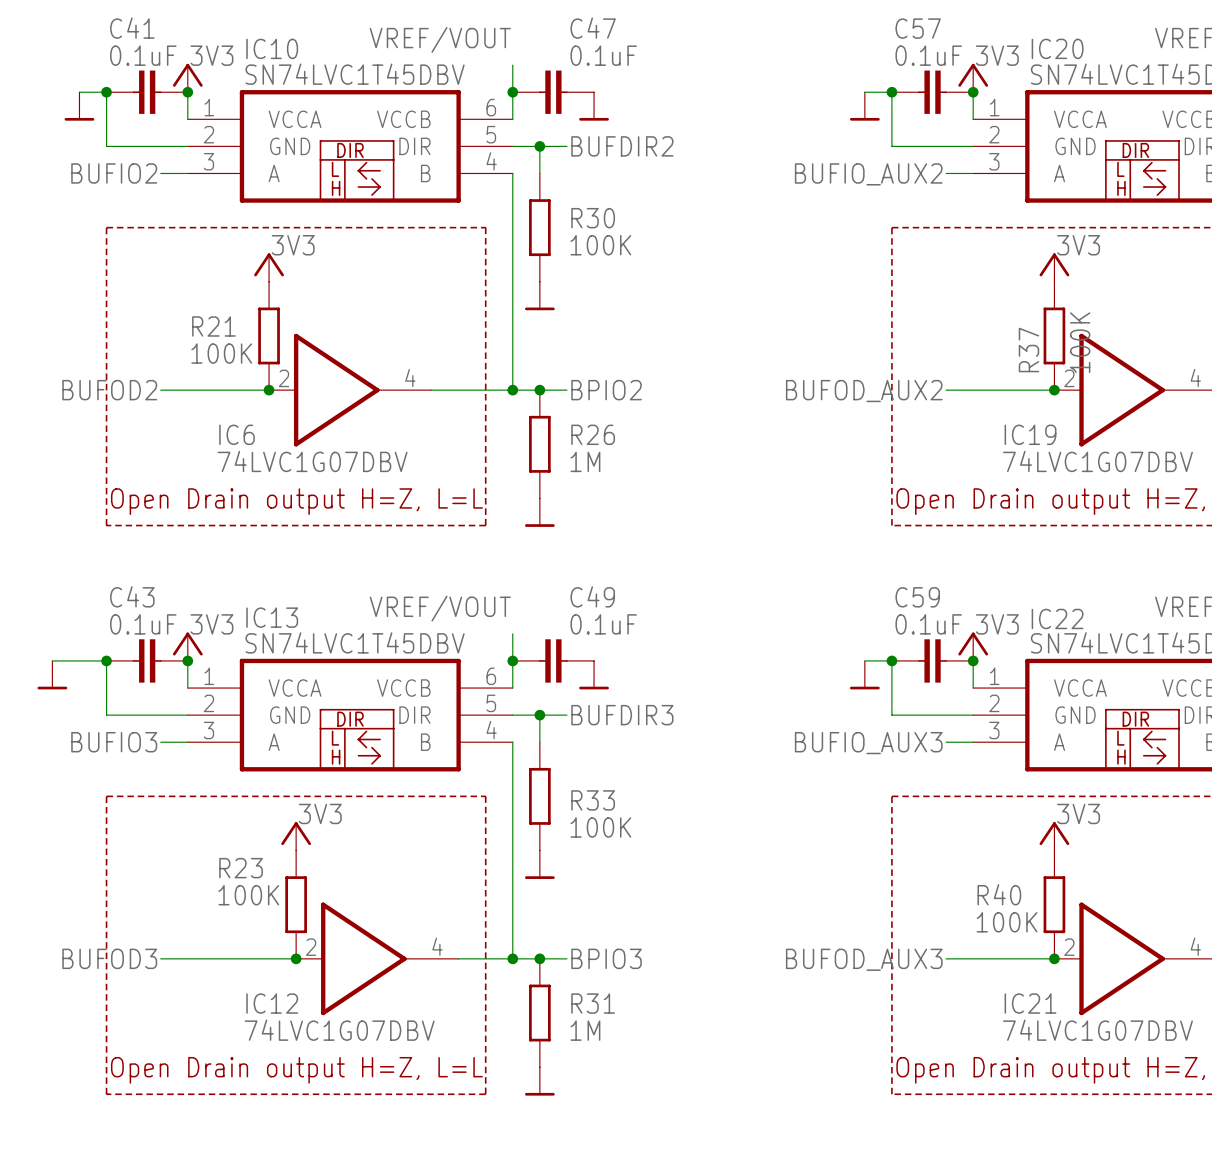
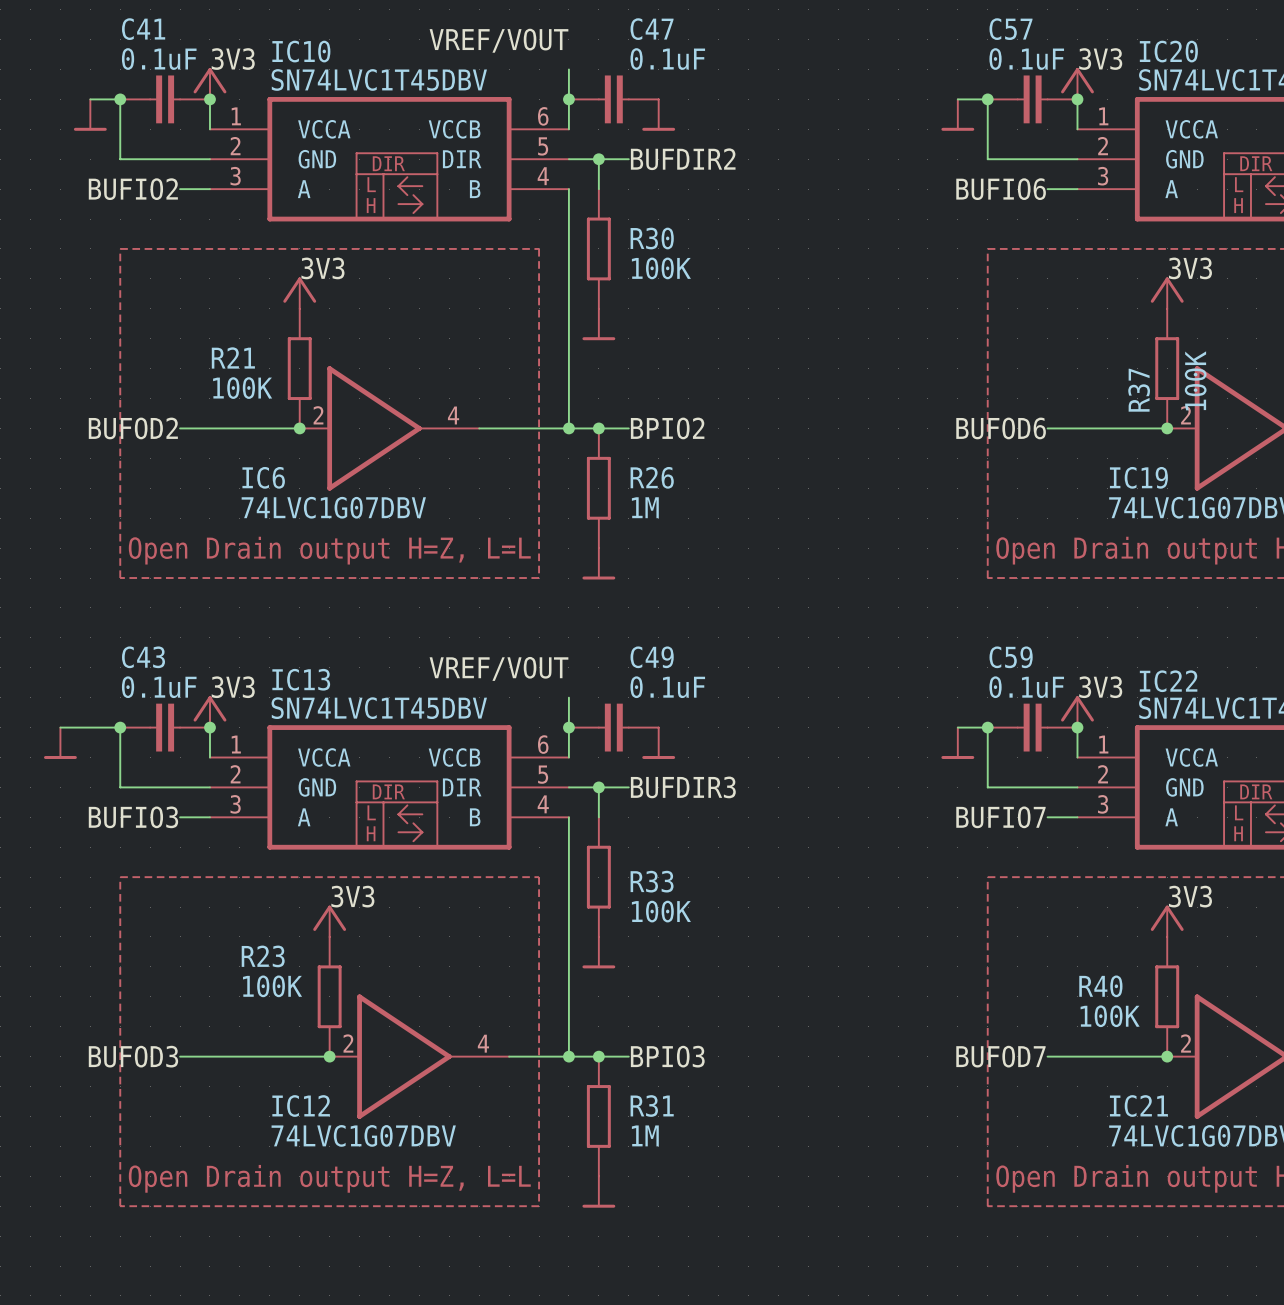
label: BUFIO_AUX2 (868, 174) -> BUFIO6 (1001, 189)
label: BUFOD_AUX2 (864, 391) -> BUFOD6 (1001, 428)
label: BUFIO_AUX3 (868, 743) -> BUFIO7 (1000, 817)
label: BUFOD_AUX3 (864, 959) -> BUFOD7 (1000, 1056)

